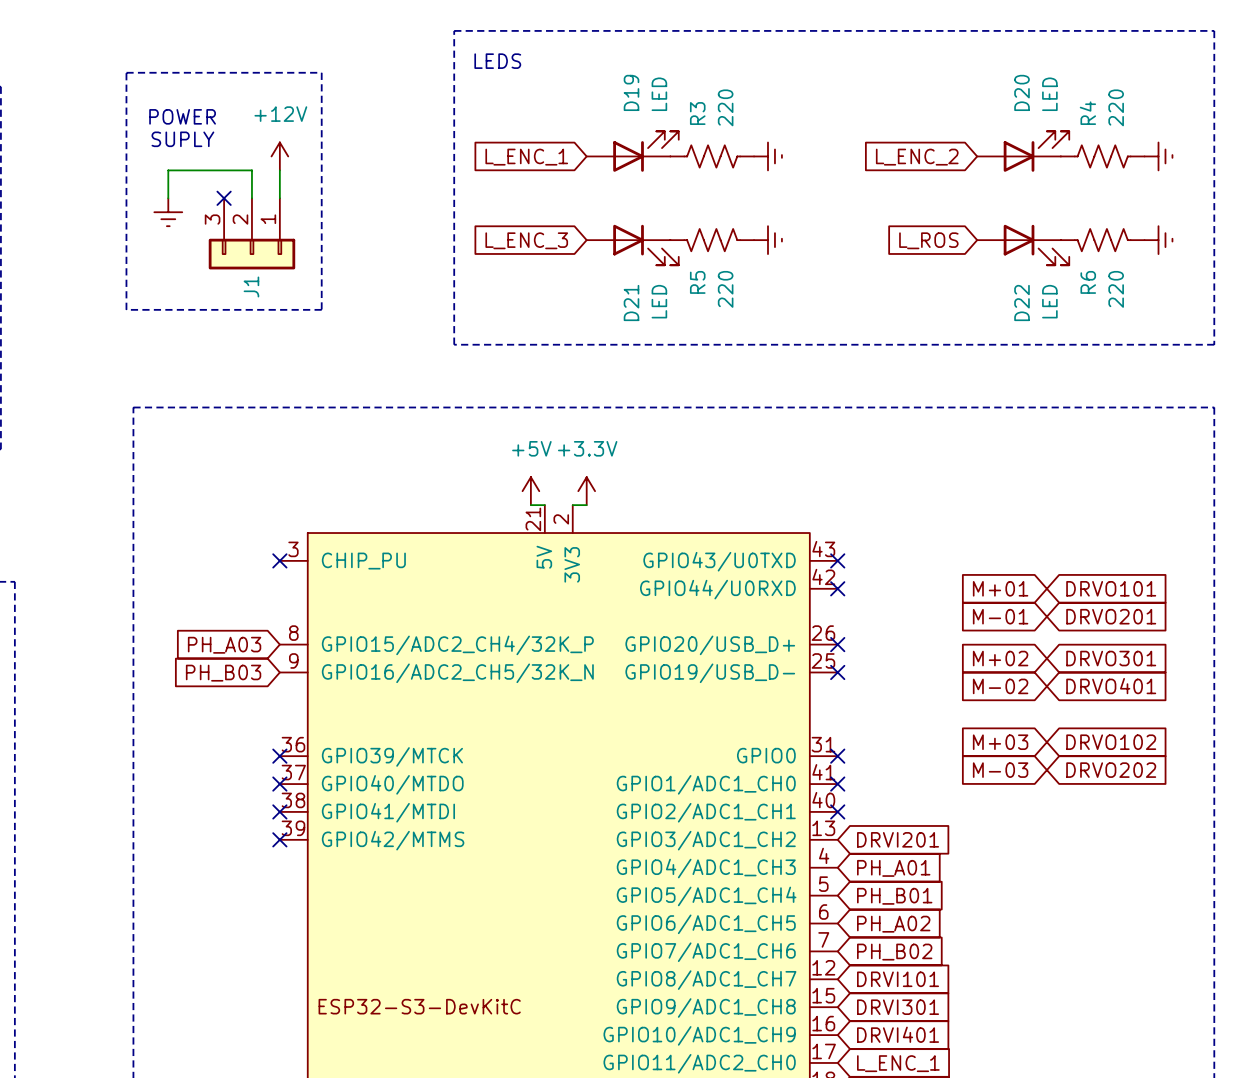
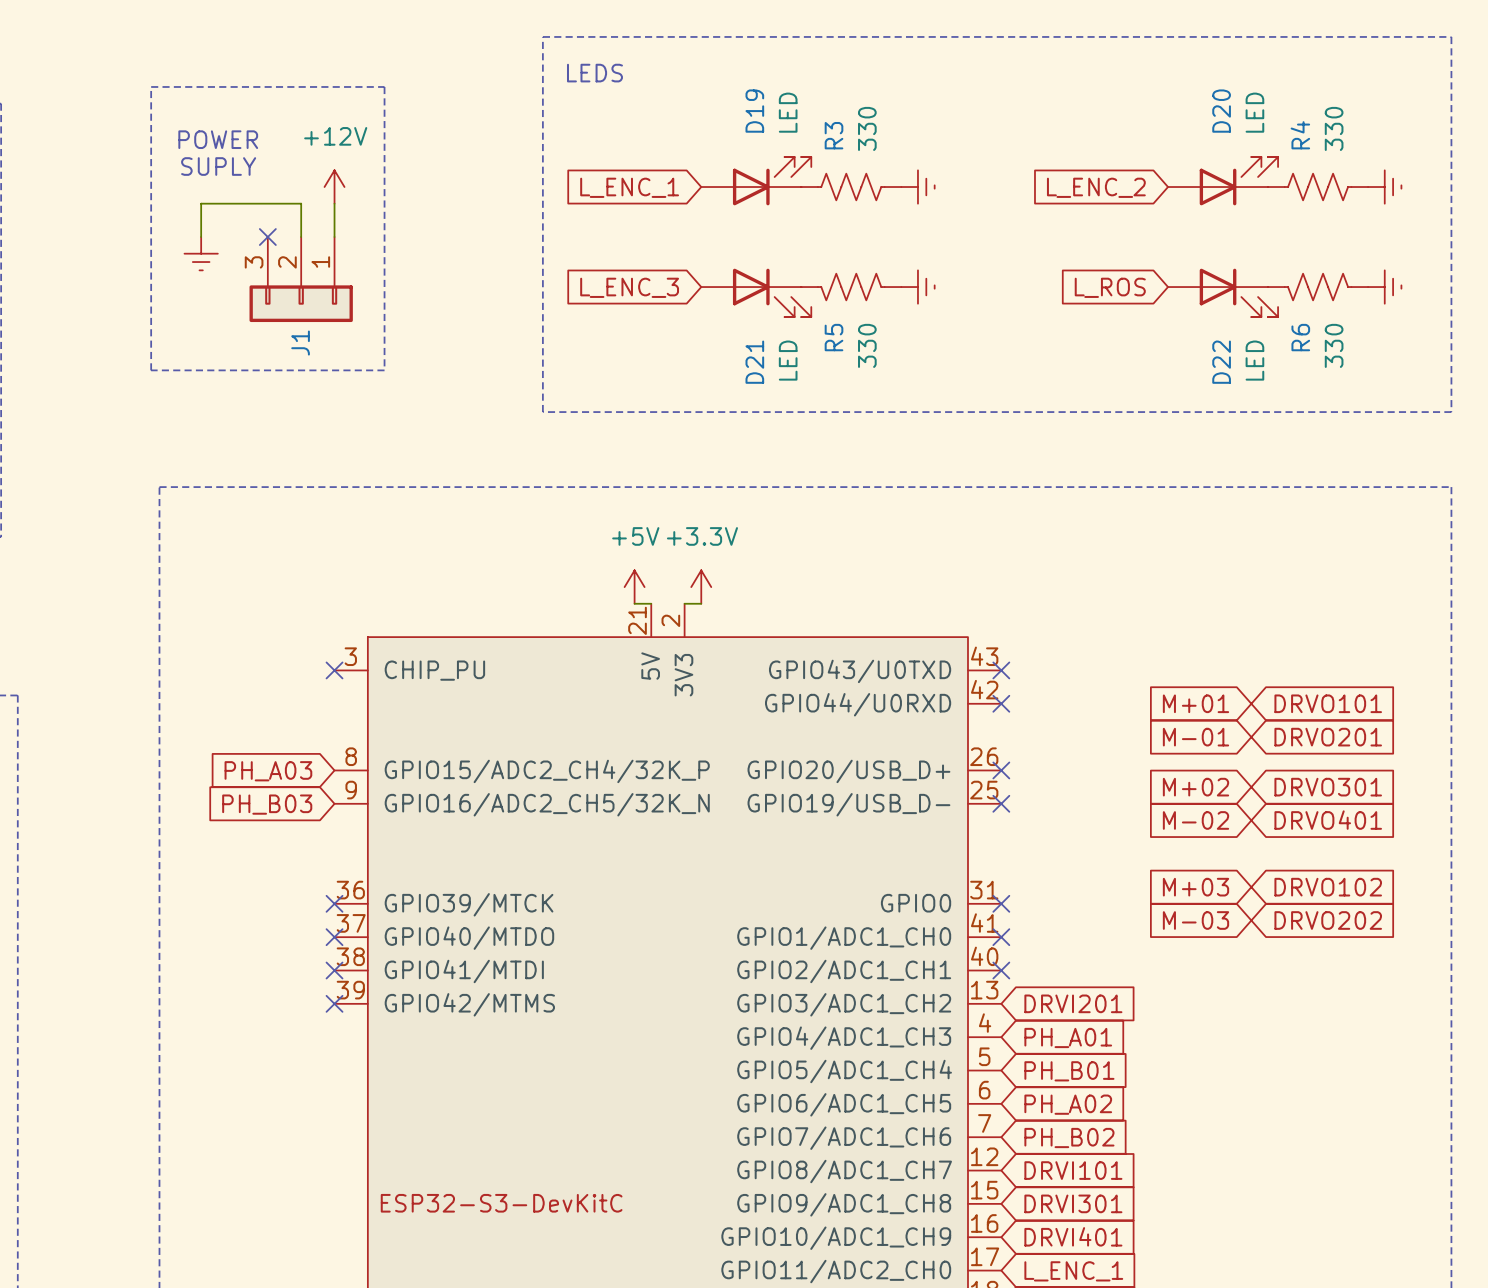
R3 value: 220 (725, 107) -> 330 (867, 128)
R4 value: 220 (1116, 107) -> 330 (1334, 128)
R5 value: 220 (725, 289) -> 330 (867, 345)
R6 value: 220 (1116, 289) -> 330 (1334, 345)

